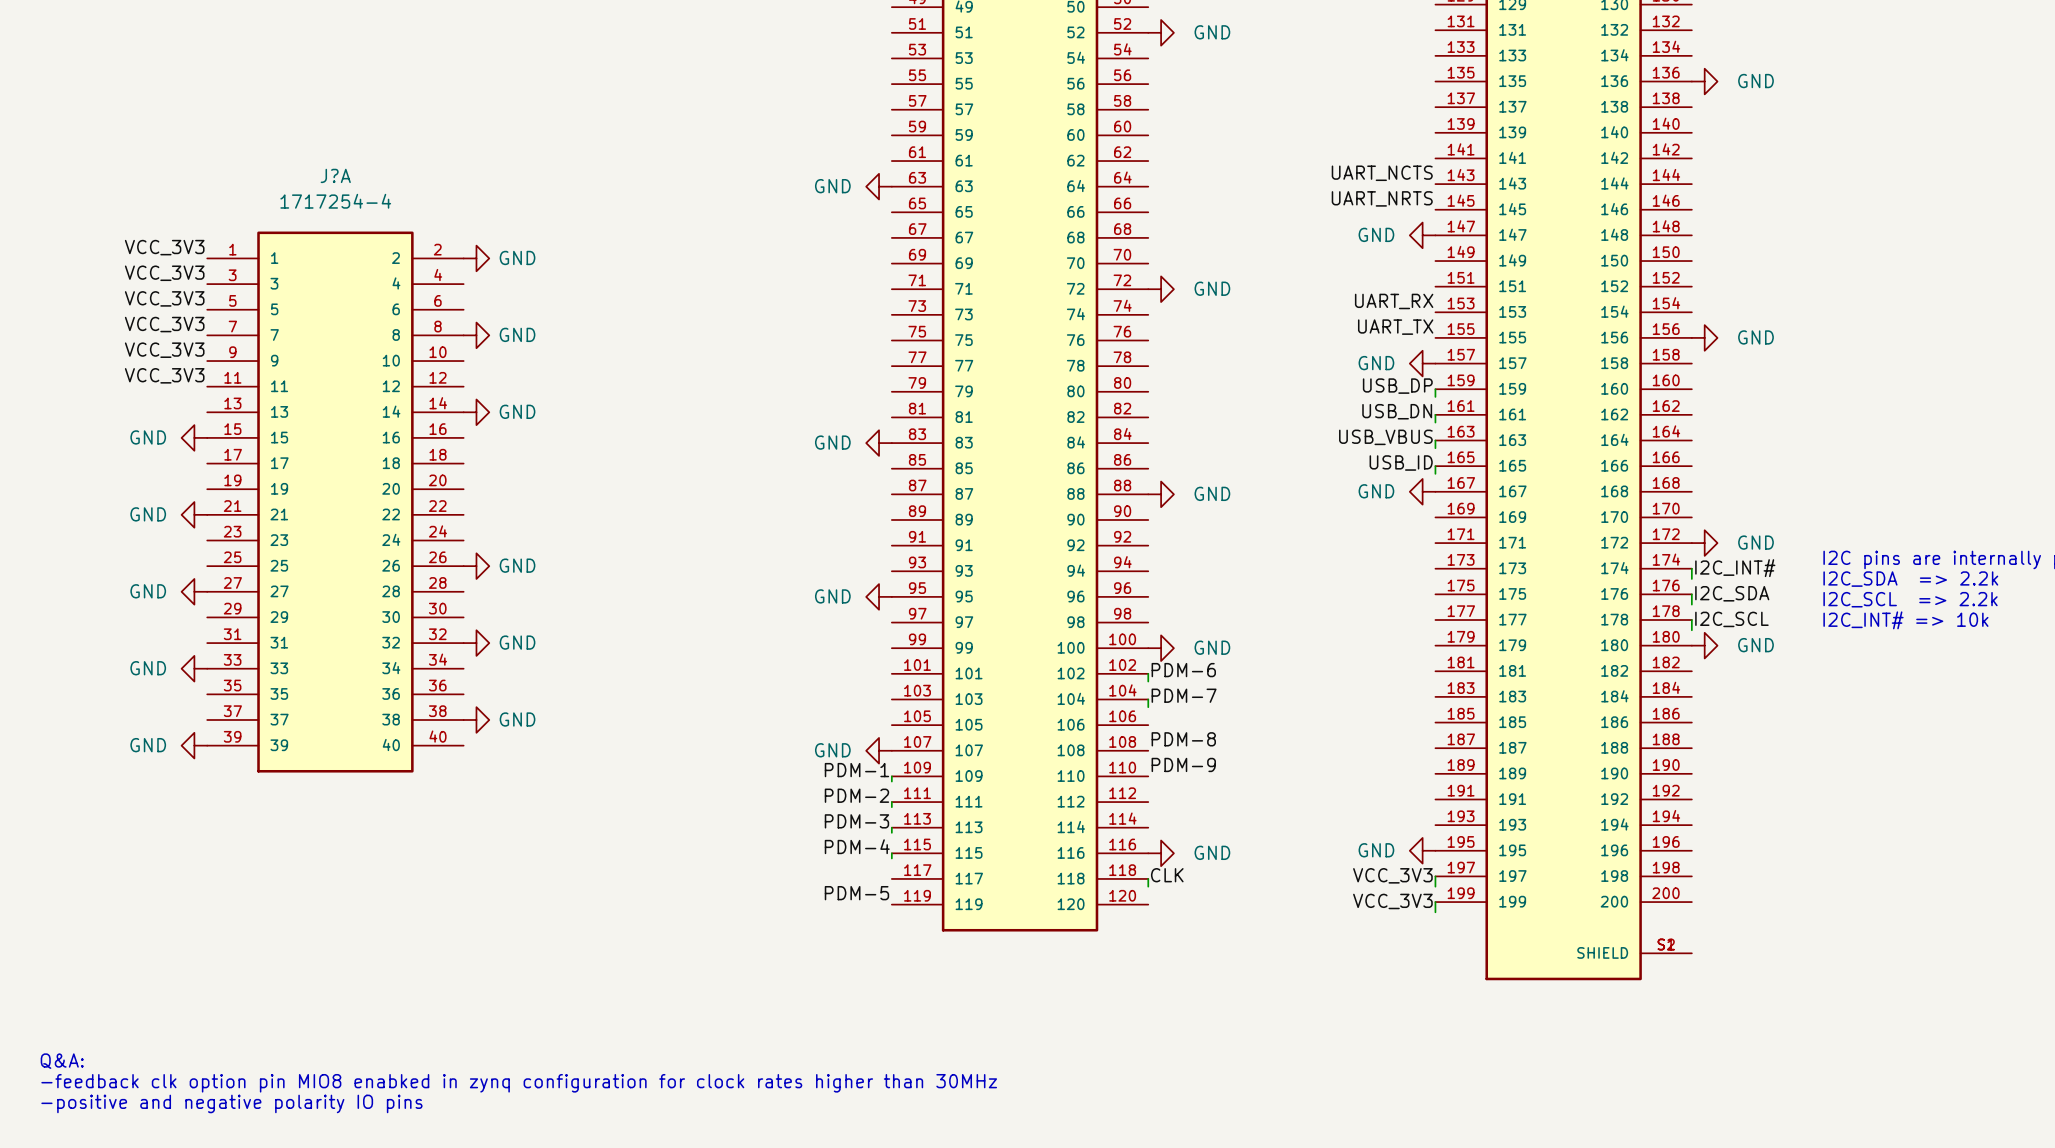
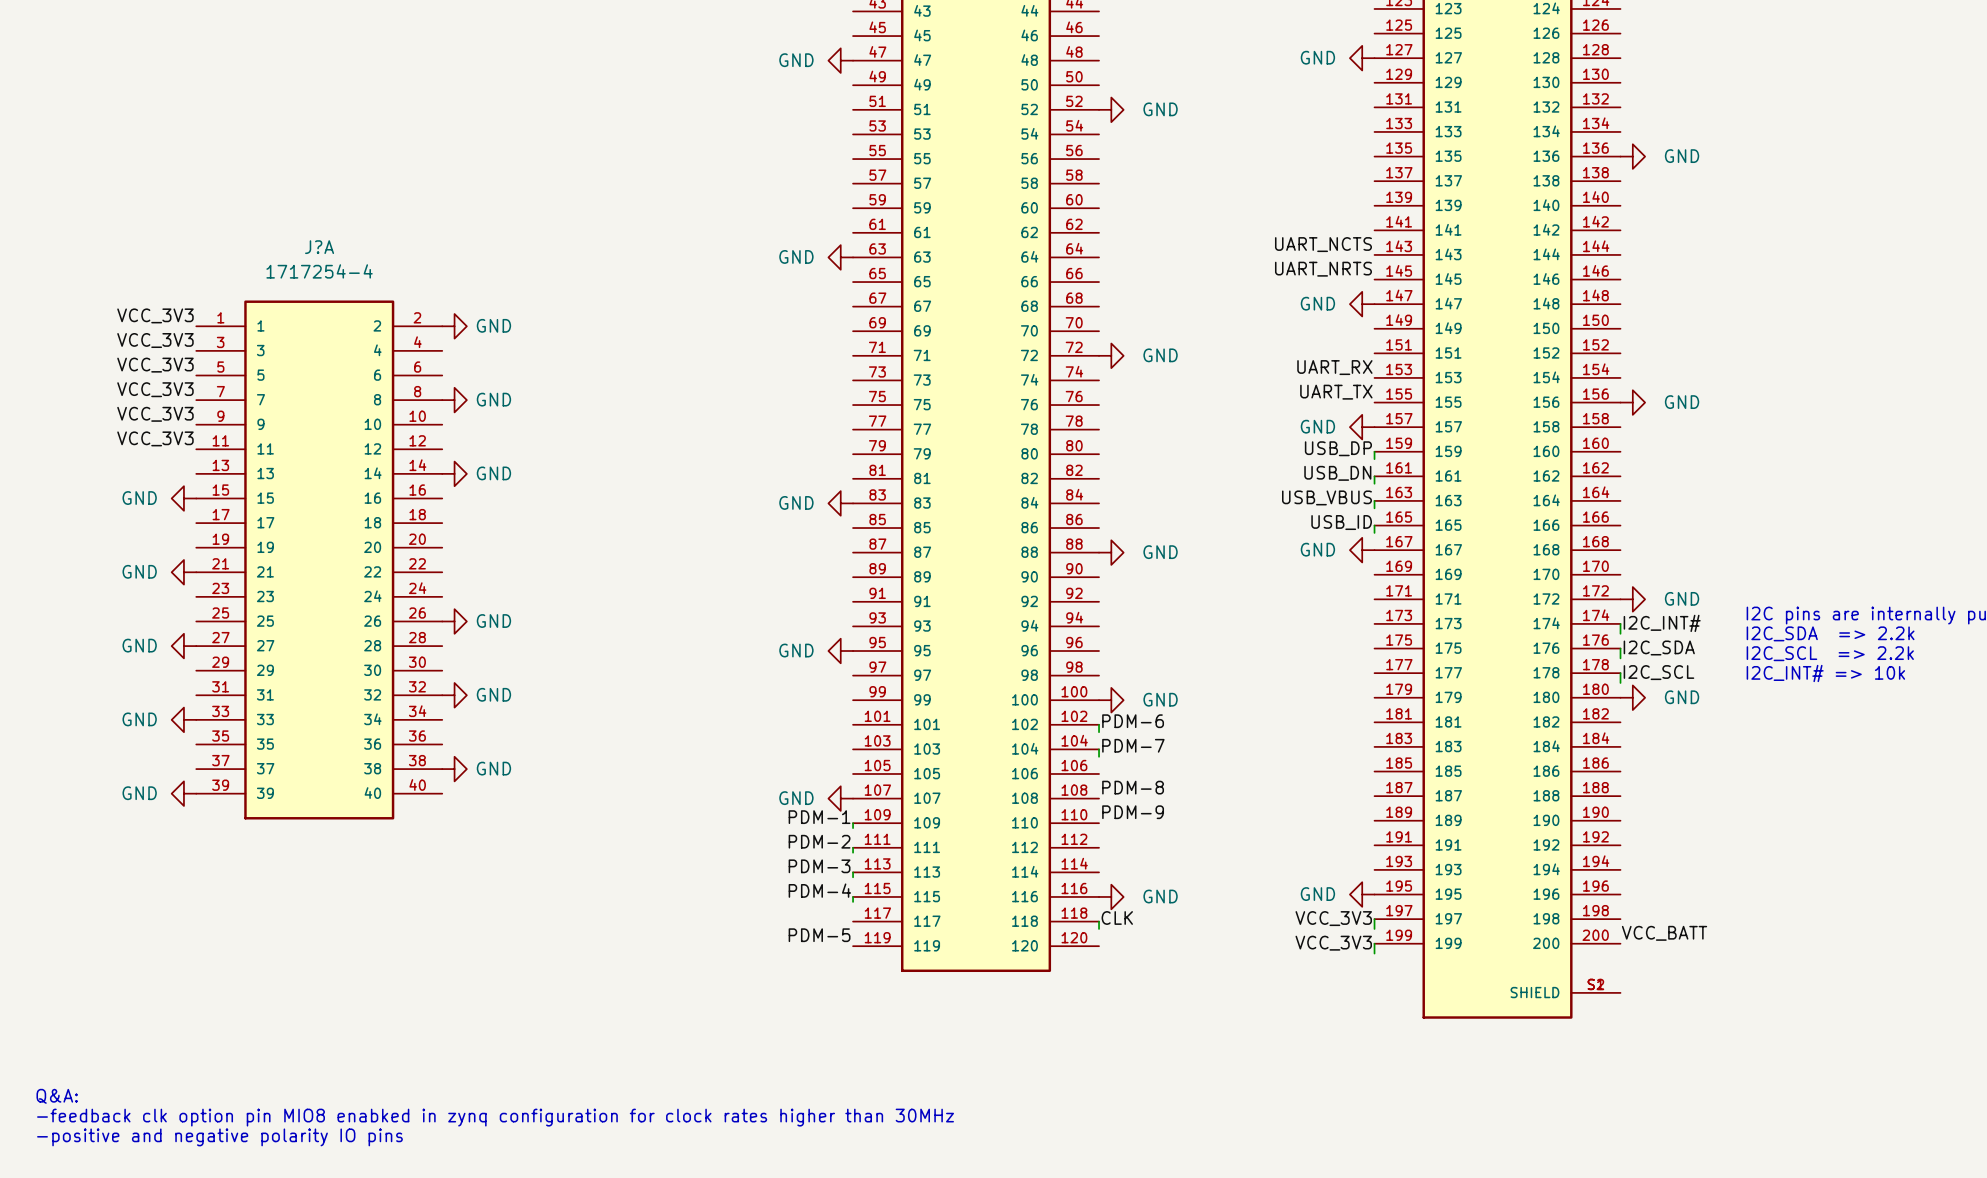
label: none -> VCC_BATT (1664, 933)

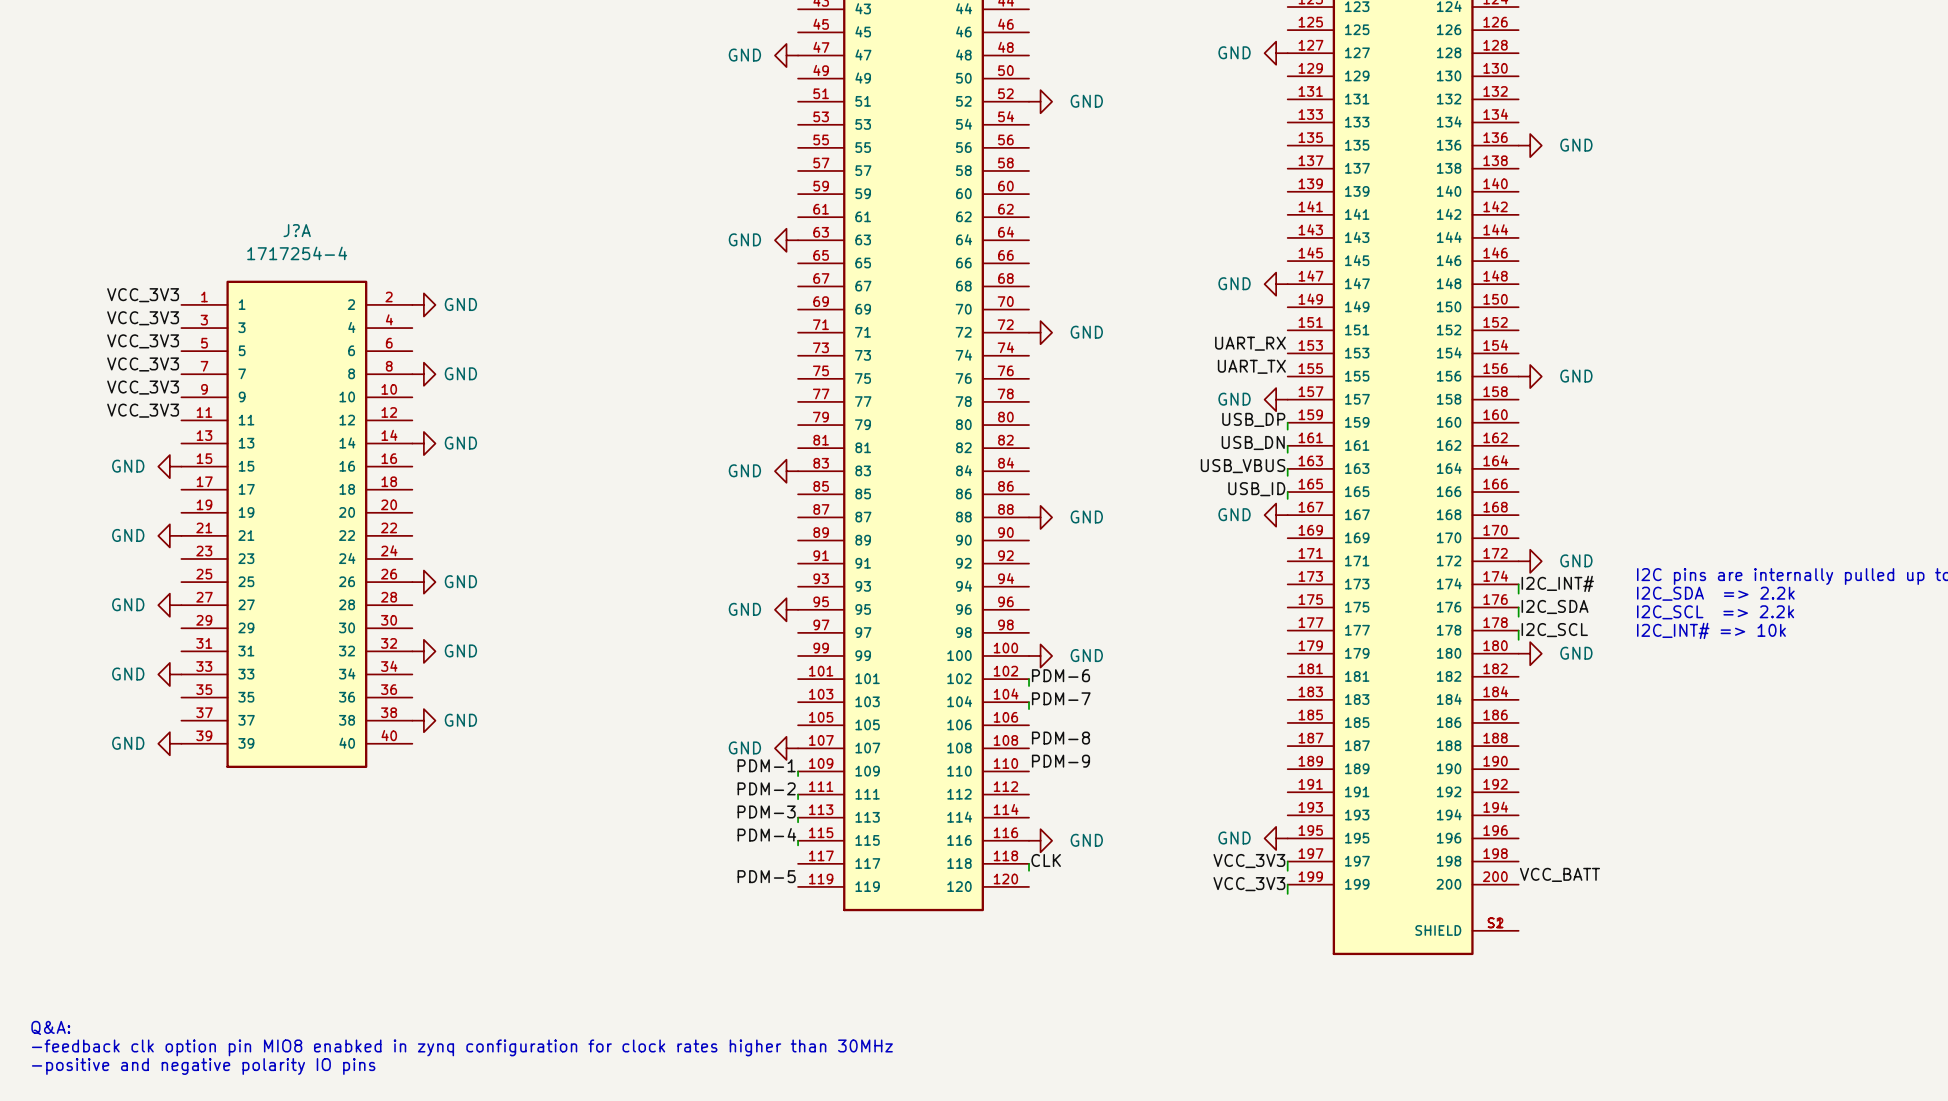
label: UART_NCTS (1323, 244) -> none
label: UART_NRTS (1323, 269) -> none

